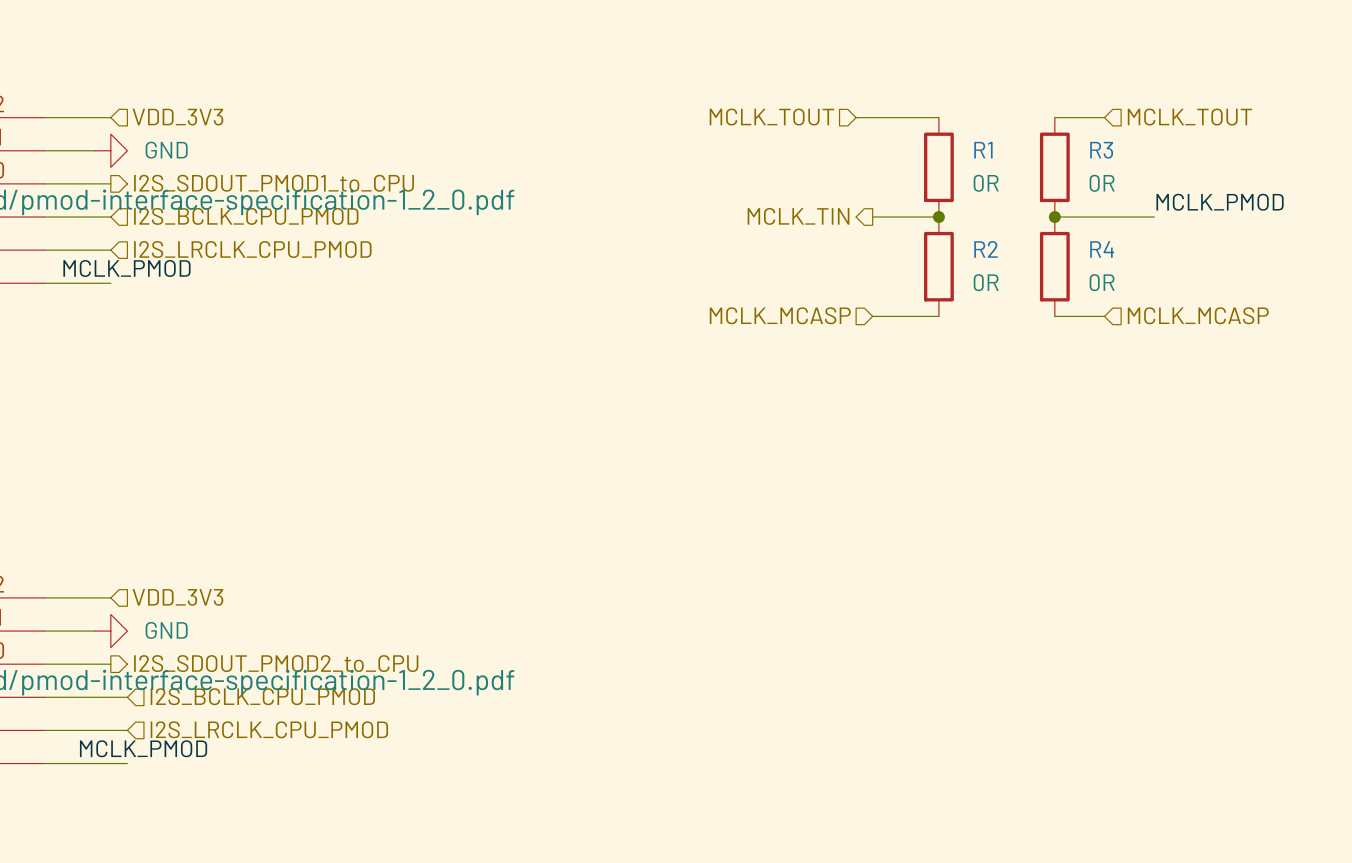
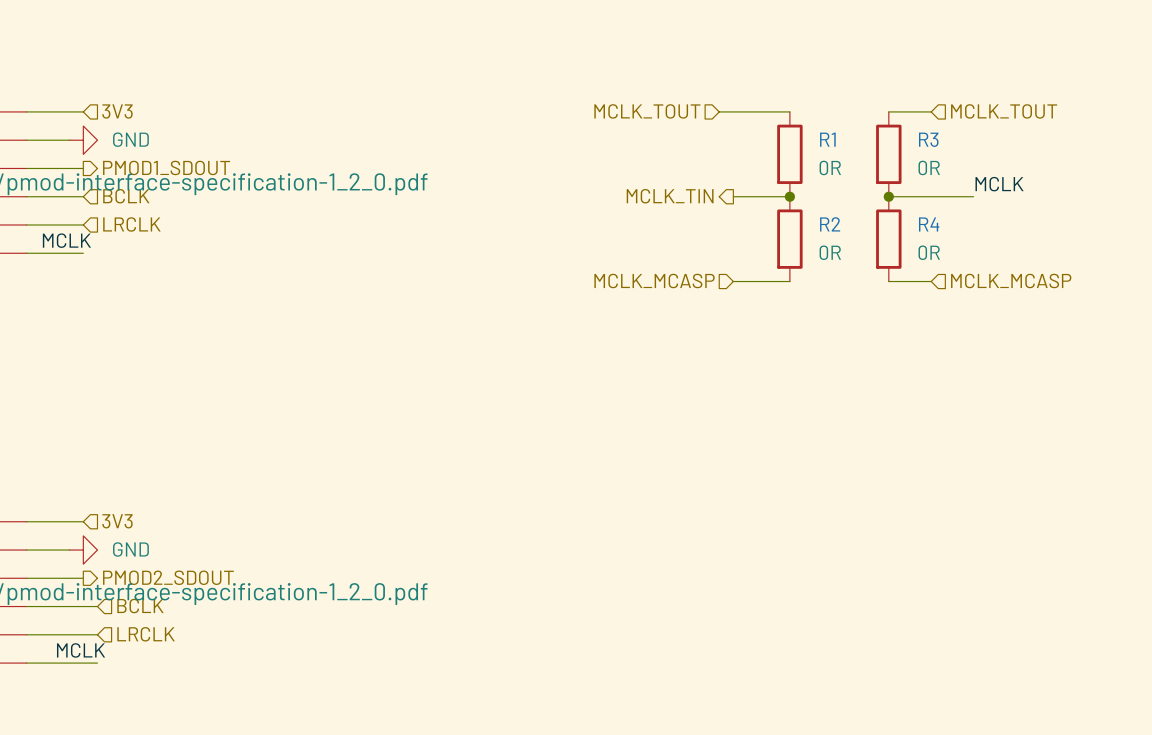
hierarchical label: VDD_3V3 (177, 117) -> 3V3 (117, 111)
hierarchical label: I2S_SDOUT_PMOD1_to_CPU (274, 183) -> PMOD1_SDOUT (166, 167)
label: MCLK_PMOD (1220, 202) -> MCLK (999, 184)
hierarchical label: I2S_BCLK_CPU_PMOD (246, 216) -> BCLK (126, 196)
hierarchical label: I2S_LRCLK_CPU_PMOD (252, 249) -> LRCLK (131, 224)
label: MCLK_PMOD (126, 268) -> MCLK (66, 240)
hierarchical label: VDD_3V3 (177, 597) -> 3V3 (117, 521)
hierarchical label: I2S_SDOUT_PMOD2_to_CPU (276, 663) -> PMOD2_SDOUT (168, 577)
hierarchical label: I2S_BCLK_CPU_PMOD (262, 696) -> BCLK (140, 606)
hierarchical label: I2S_LRCLK_CPU_PMOD (269, 729) -> LRCLK (146, 634)
label: MCLK_PMOD (143, 748) -> MCLK (81, 650)

